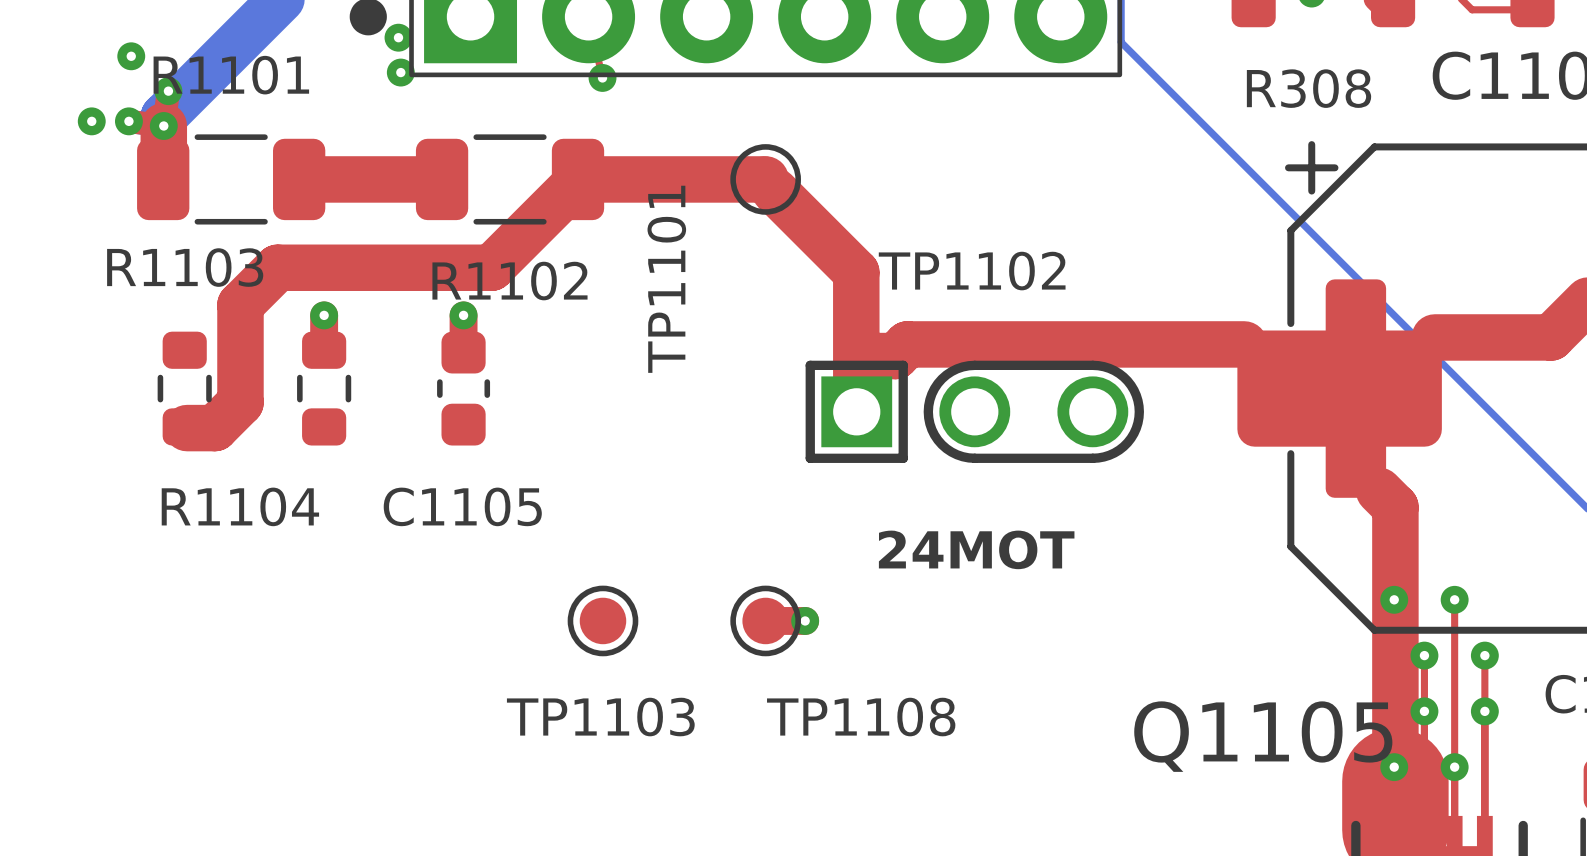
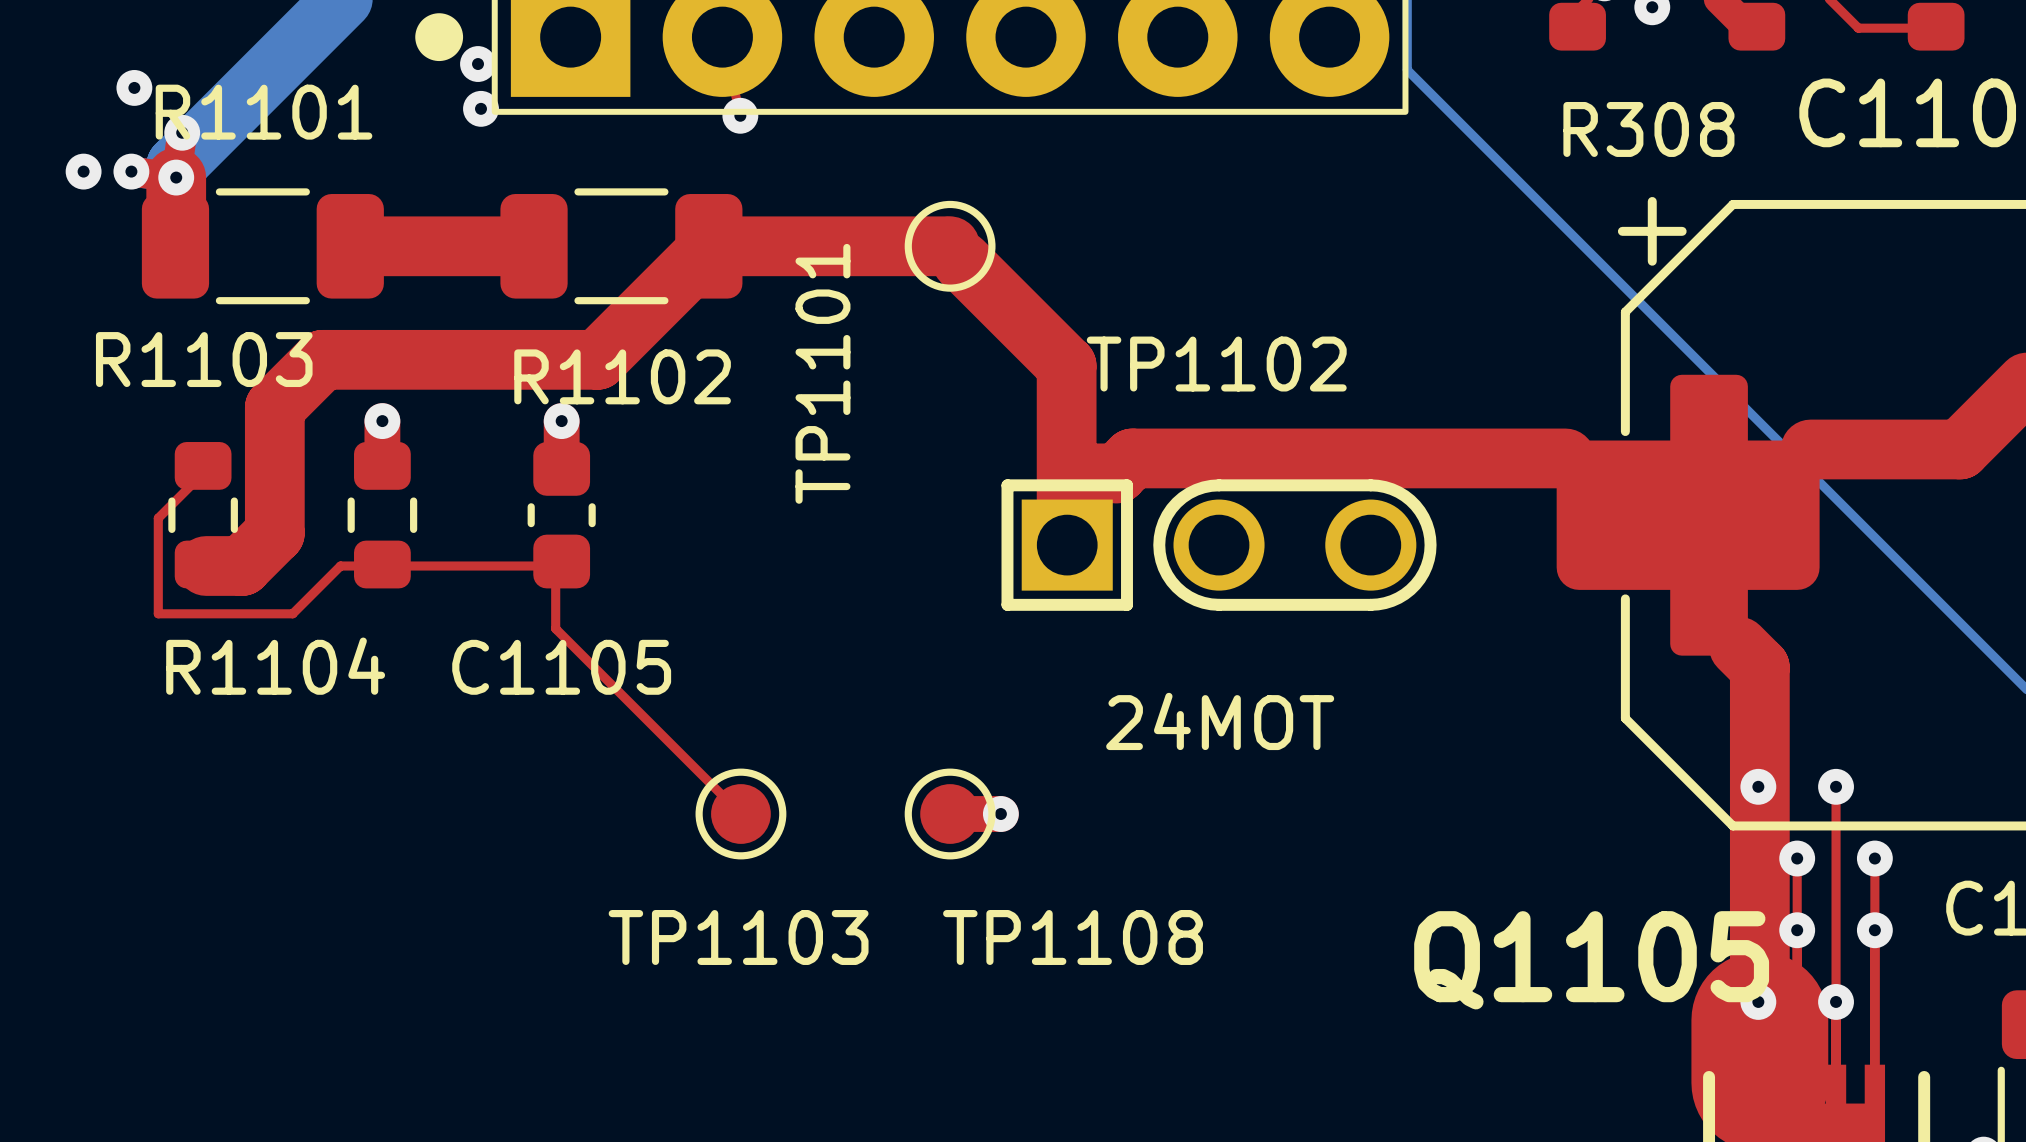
top track: none -> (203, 467) (203, 473) (158, 518) (158, 613) (292, 613) (340, 566) (379, 566)
top track: none -> (558, 563) (555, 566) (385, 566)
top track: none -> (555, 568) (555, 628) (737, 811)

